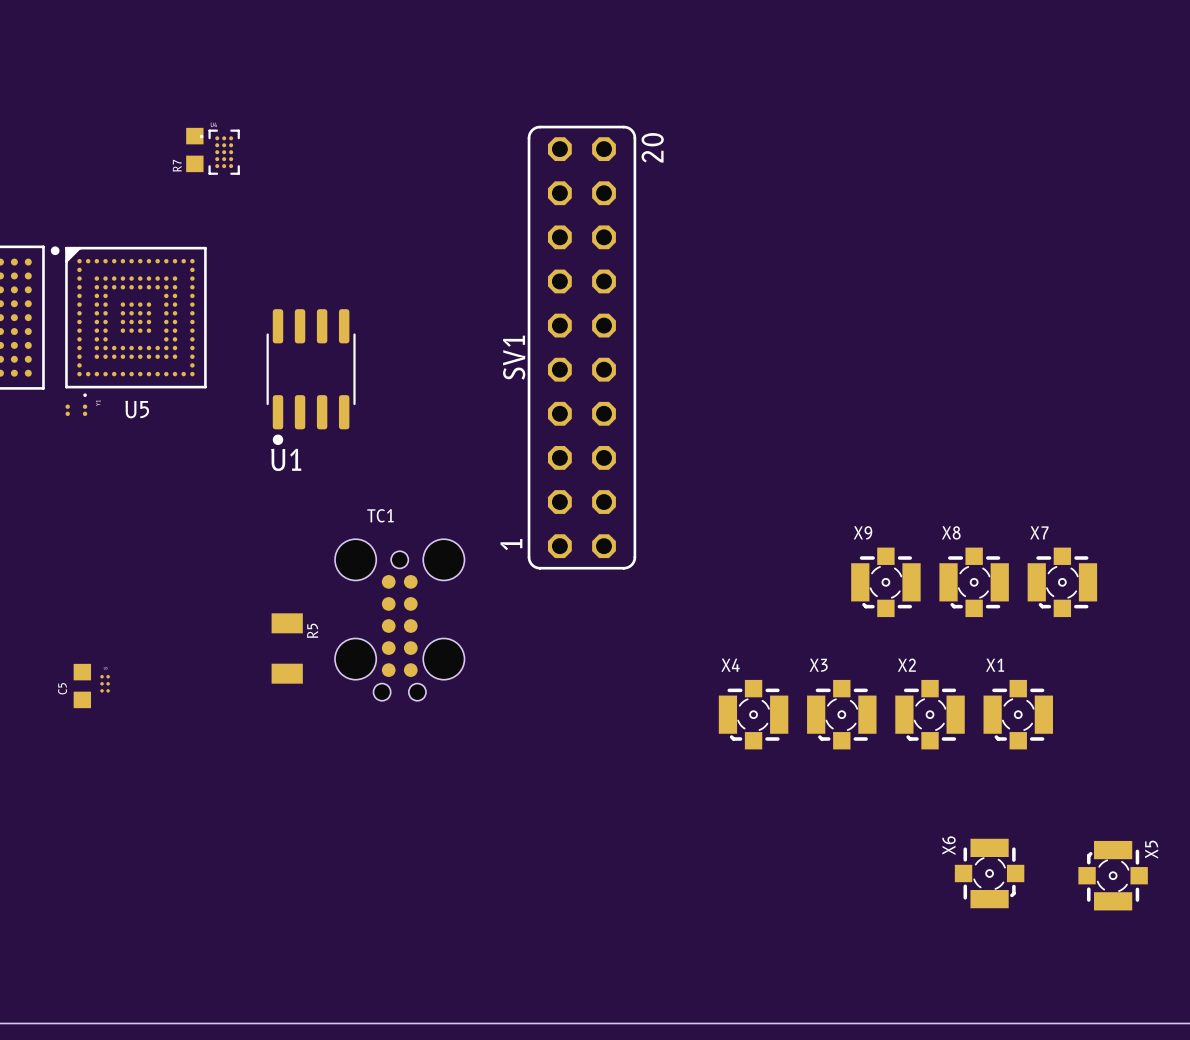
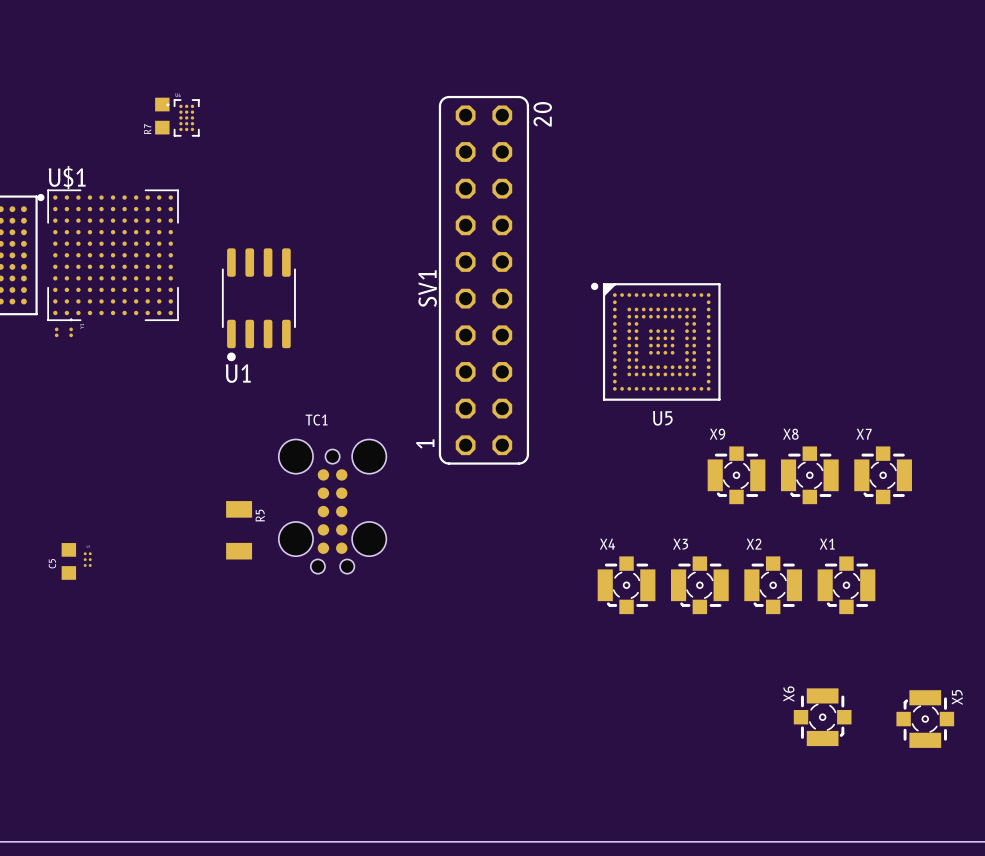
U5 position: (128, 317) -> (655, 341)
U$1: none -> (108, 255)

